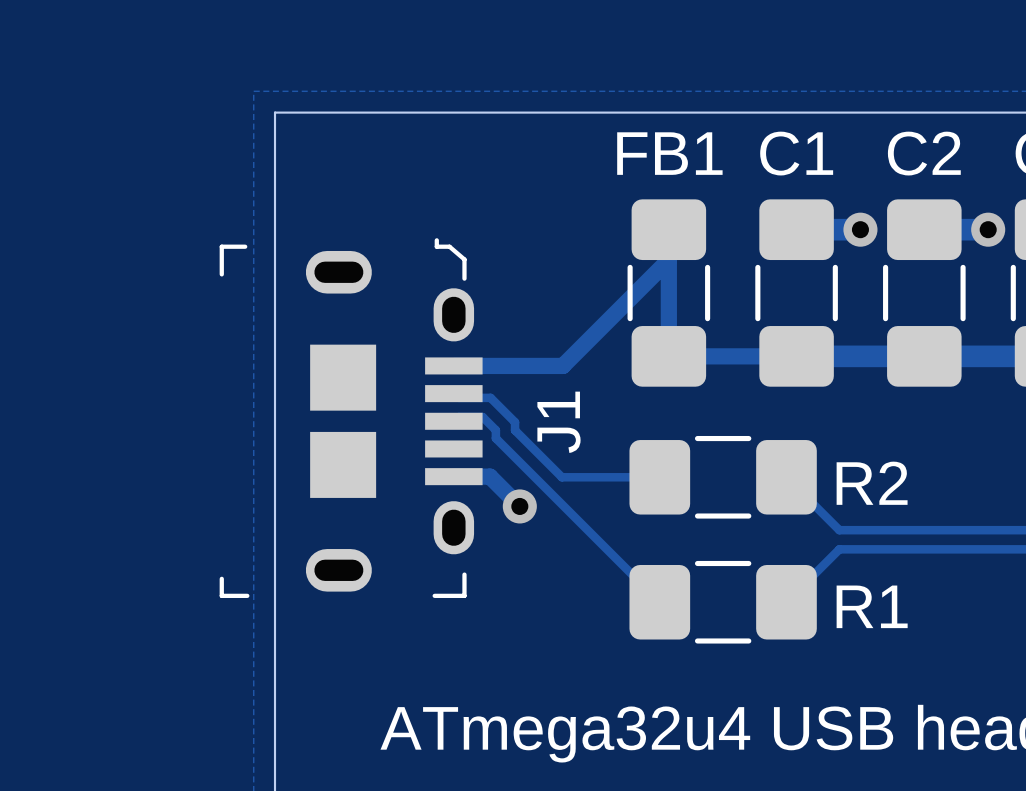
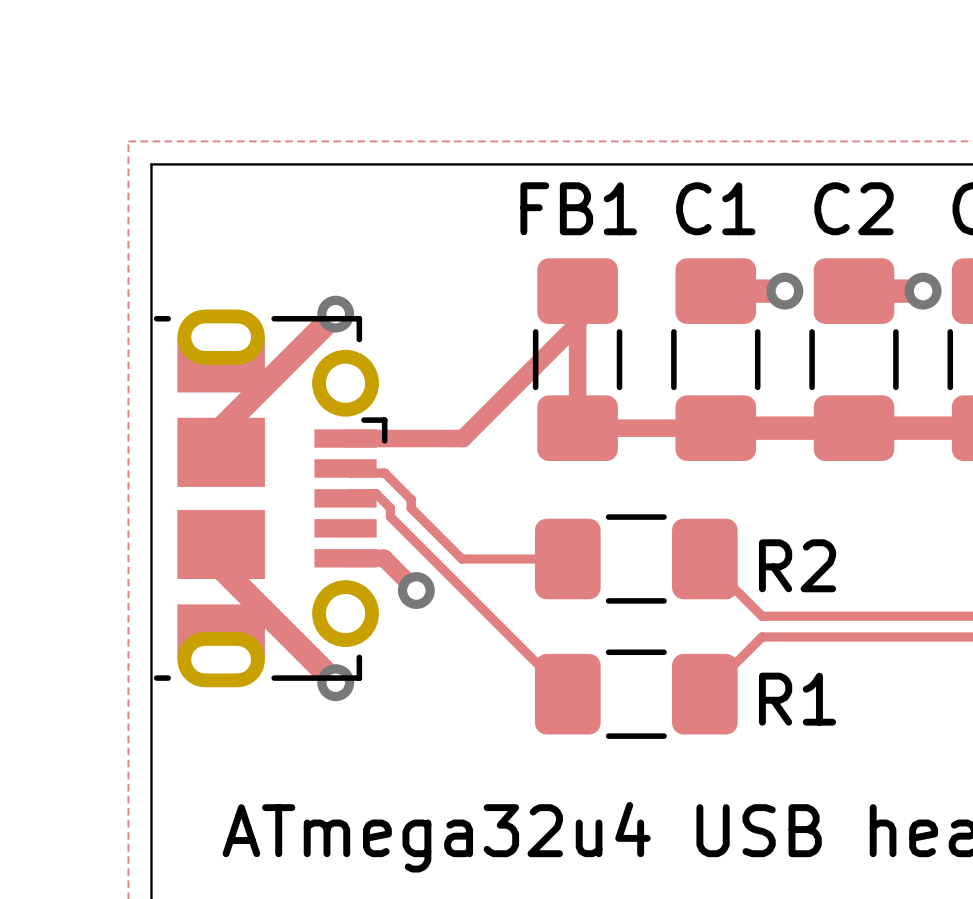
track: none -> (335, 314) (221, 428) (221, 452)
via: none -> (335, 314)
J1: (351, 418) -> none
part: none -> (270, 498)
track: none -> (221, 544) (221, 568) (335, 682)
via: none -> (335, 682)

